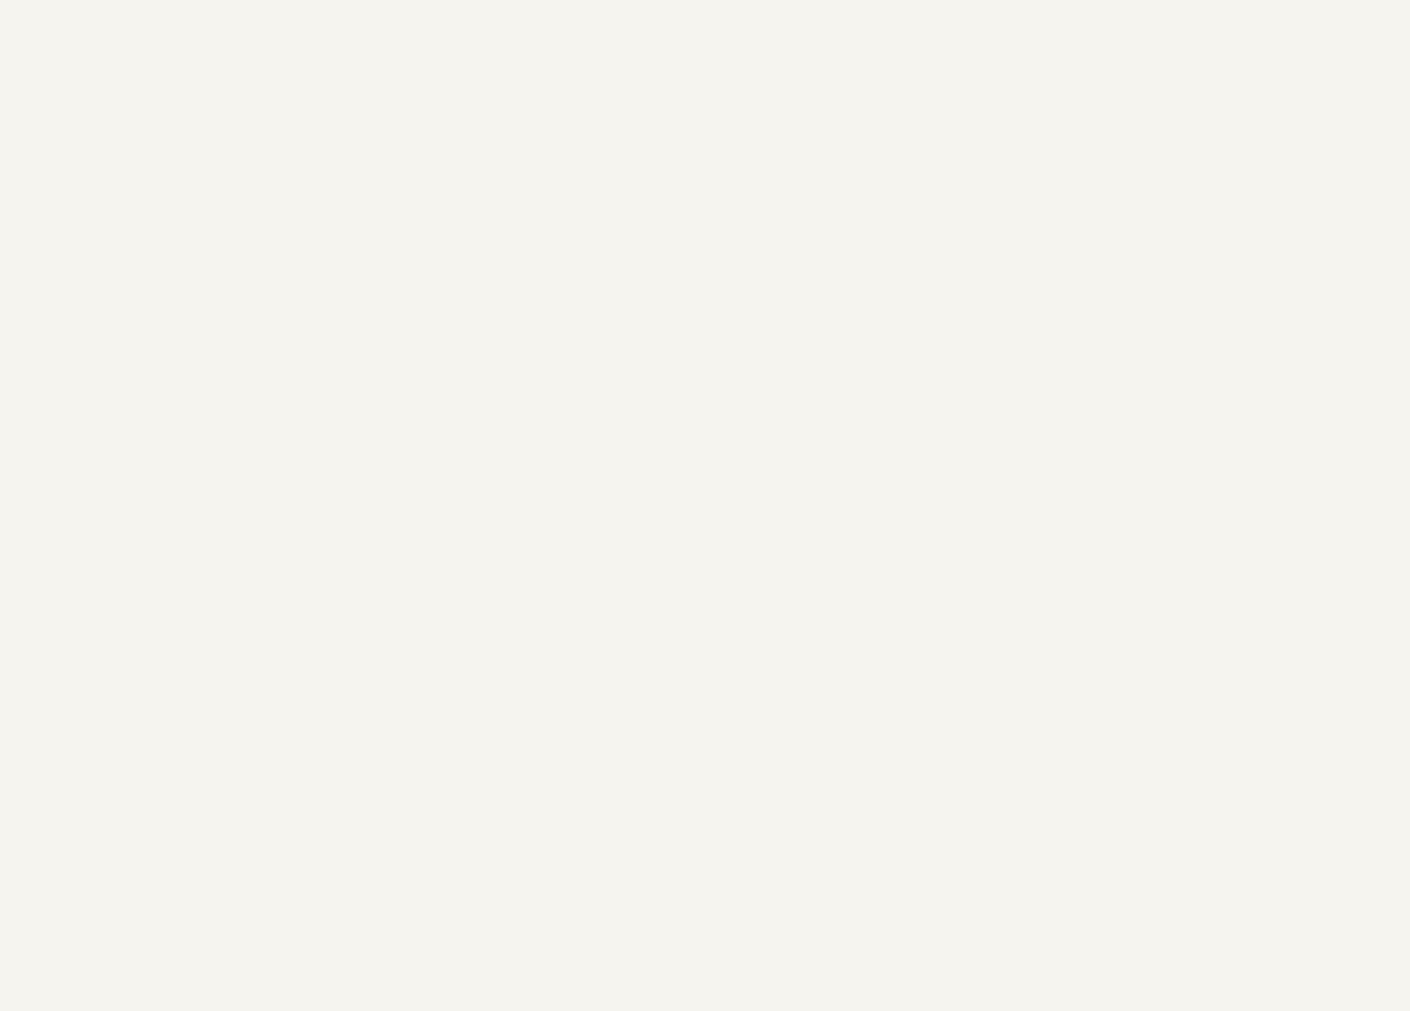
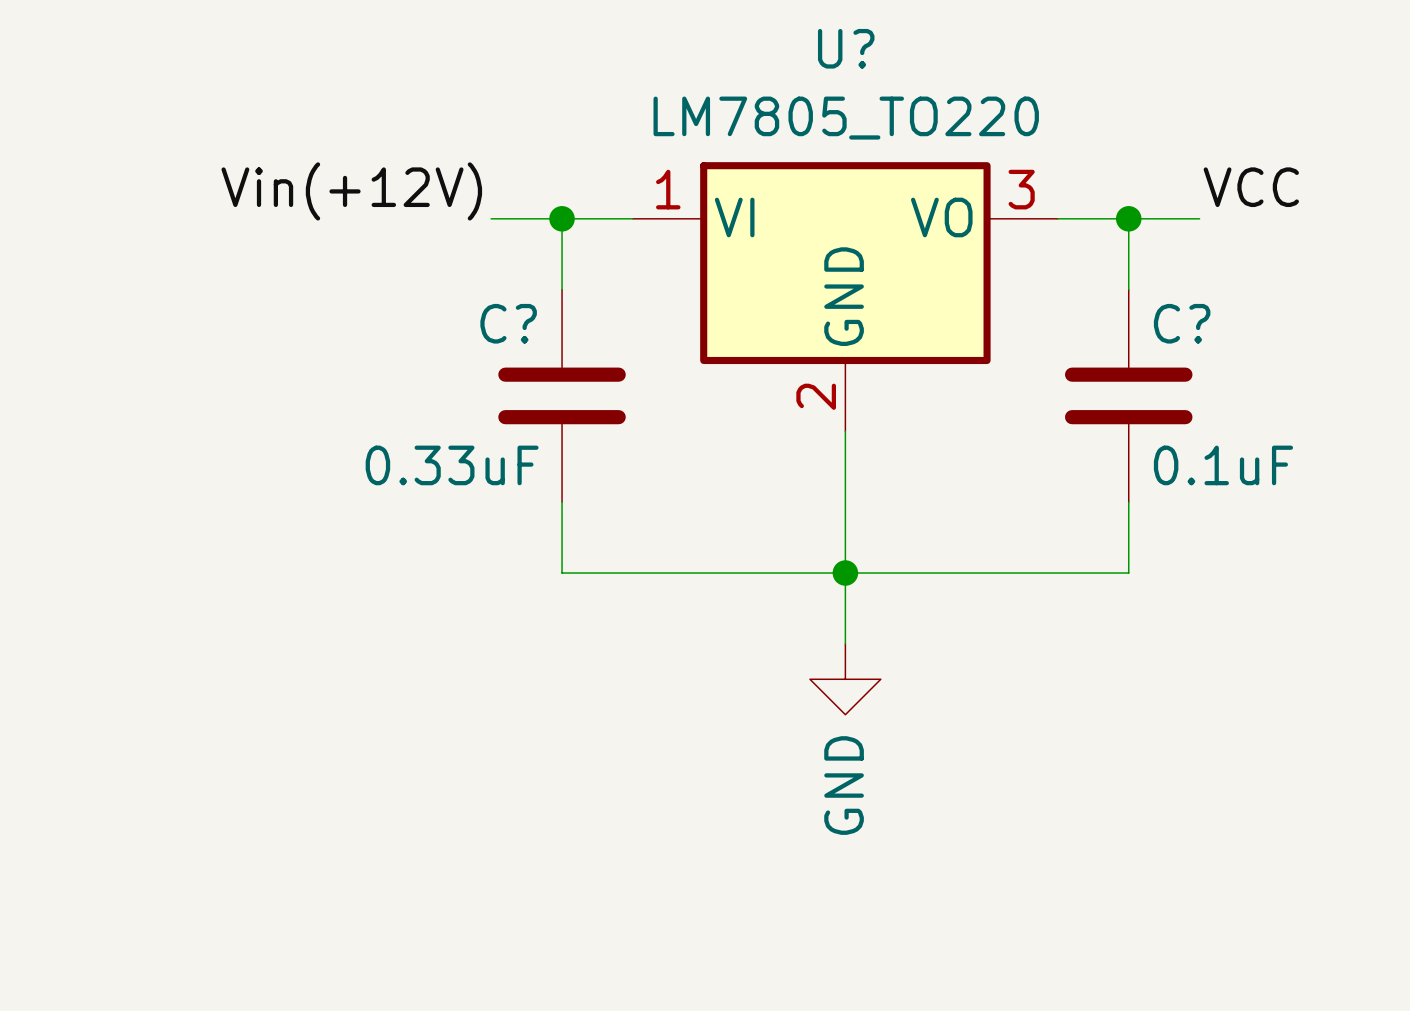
label: none -> VCC (1251, 187)
label: none -> Vin(+12V) (351, 191)
wire: none -> (491, 218) (632, 218)
wire: none -> (562, 218) (562, 289)
junction: none -> (562, 218)
wire: none -> (1057, 218) (1199, 218)
wire: none -> (1128, 218) (1128, 289)
junction: none -> (1128, 218)
U?: none -> LM7805_TO220 (845, 296)
C?: none -> 0.33uF (562, 395)
C?: none -> 0.1uF (1128, 395)
wire: none -> (845, 431) (845, 643)
wire: none -> (562, 502) (562, 573) (1128, 573) (1128, 502)
junction: none -> (845, 573)
power symbol: none -> GND (845, 679)

